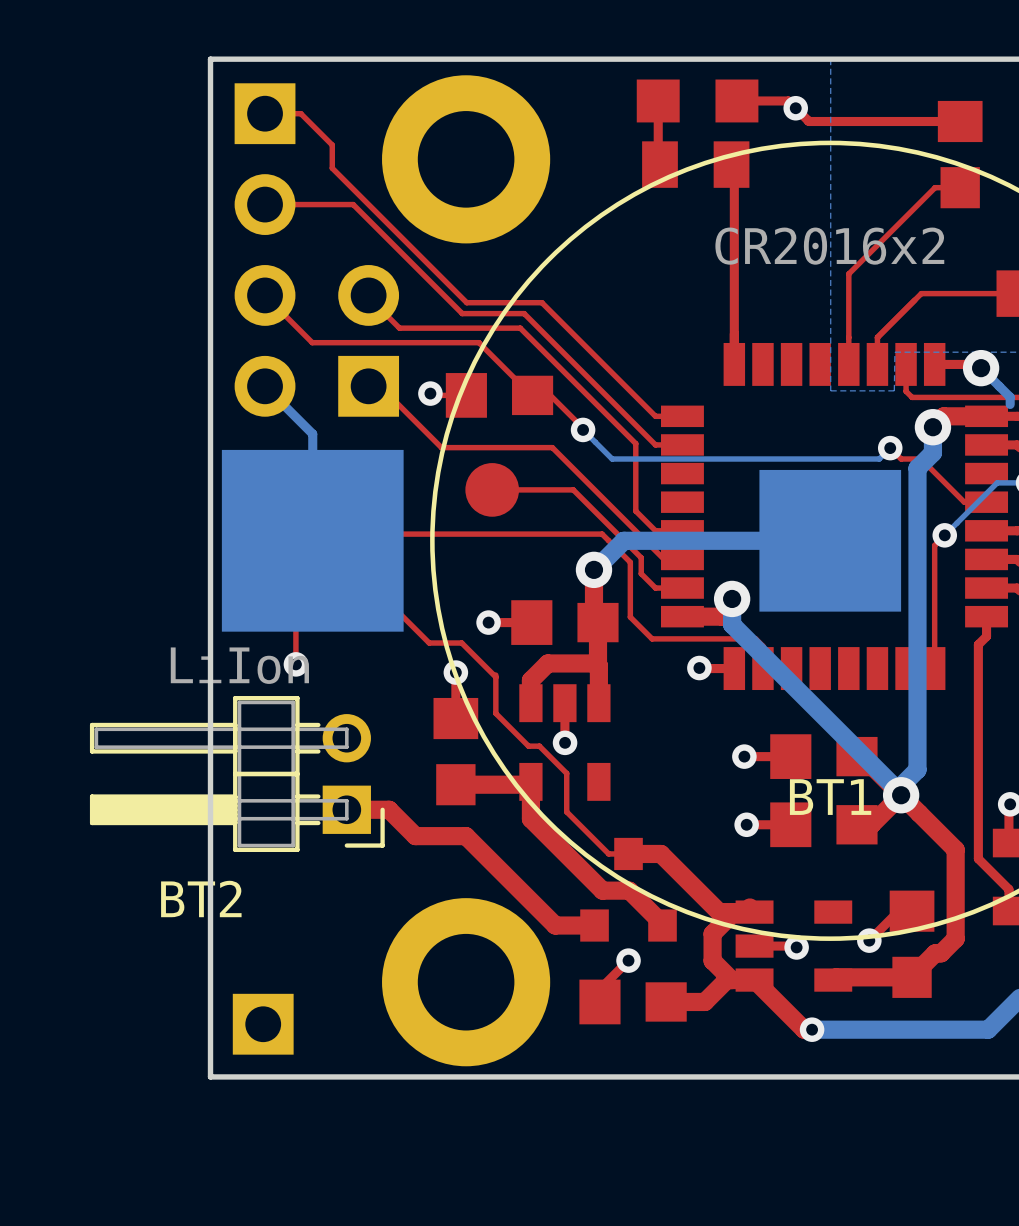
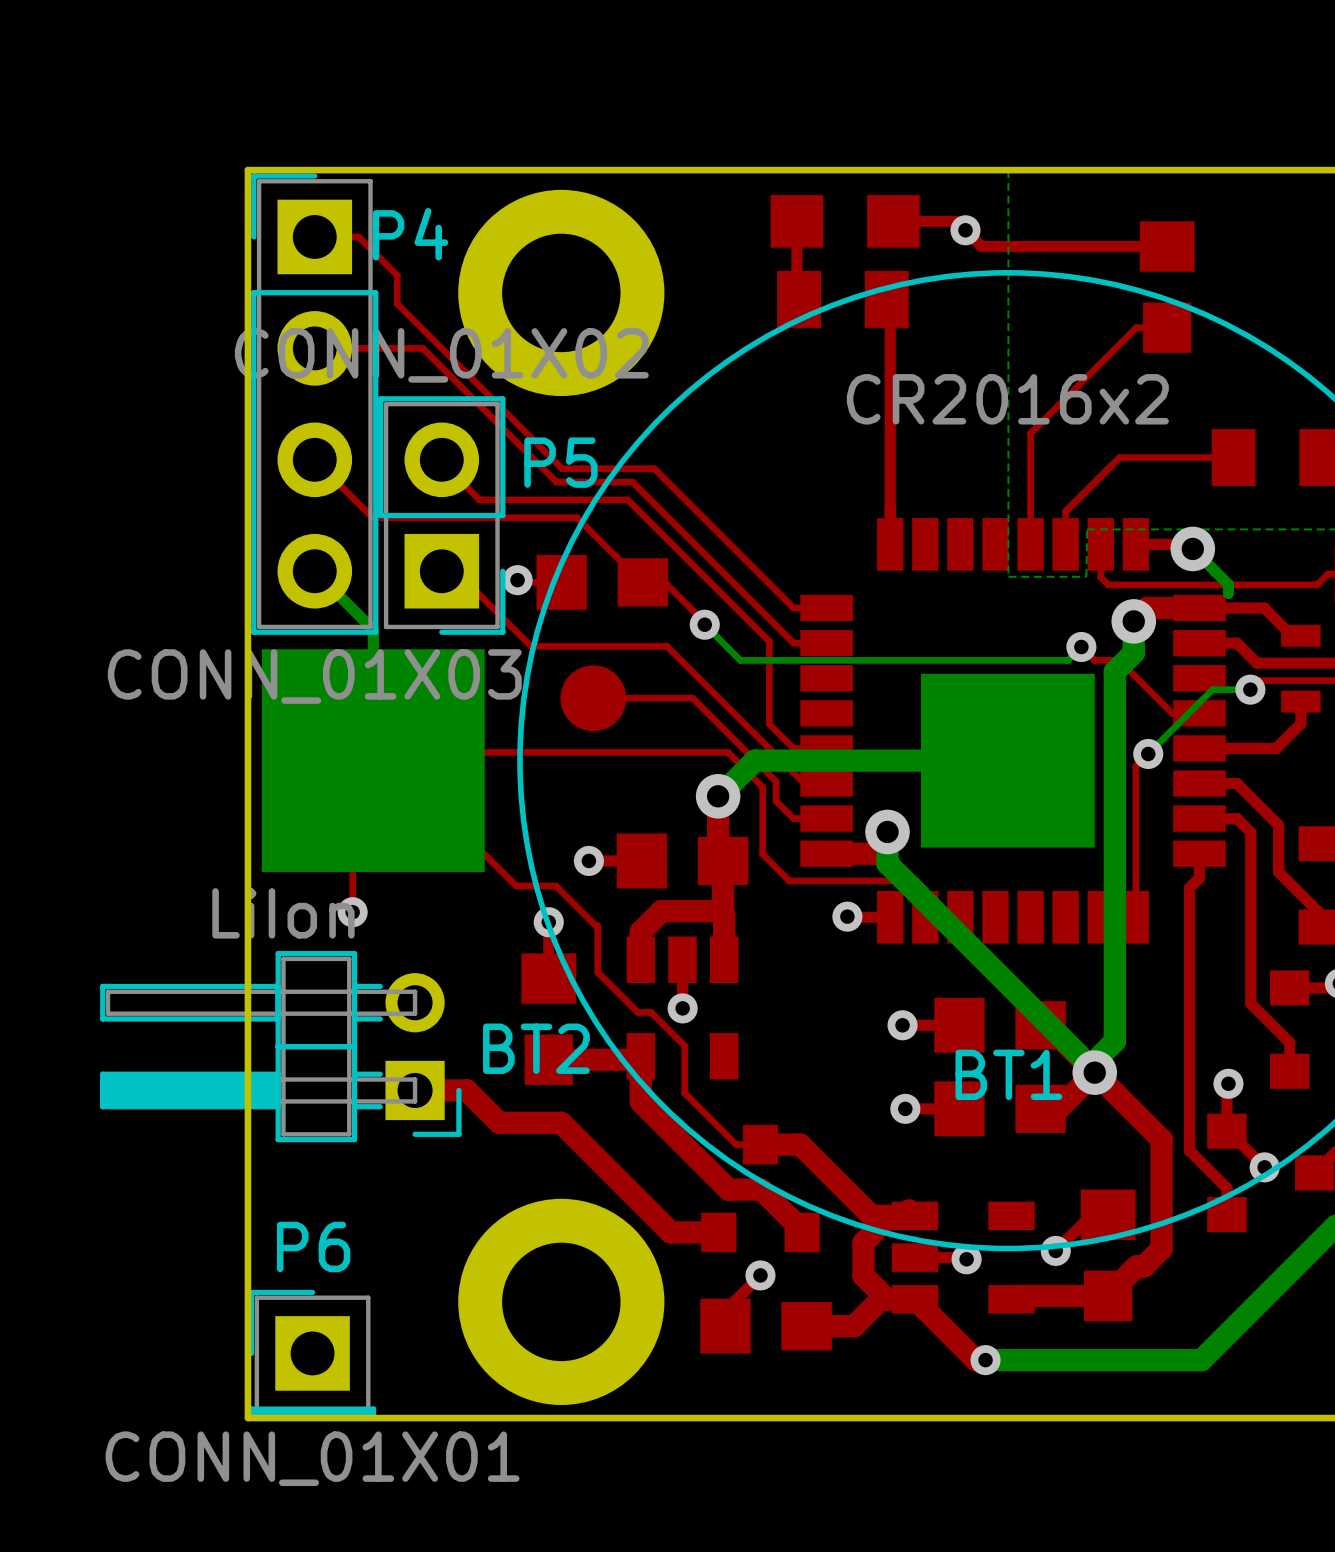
P4 side: top (265, 250) -> bottom (314, 404)
P5 side: top (368, 340) -> bottom (441, 515)
BT2 name position: BT2 (201, 898) -> BT2 (536, 1048)
P6 side: top (263, 1024) -> bottom (312, 1353)

